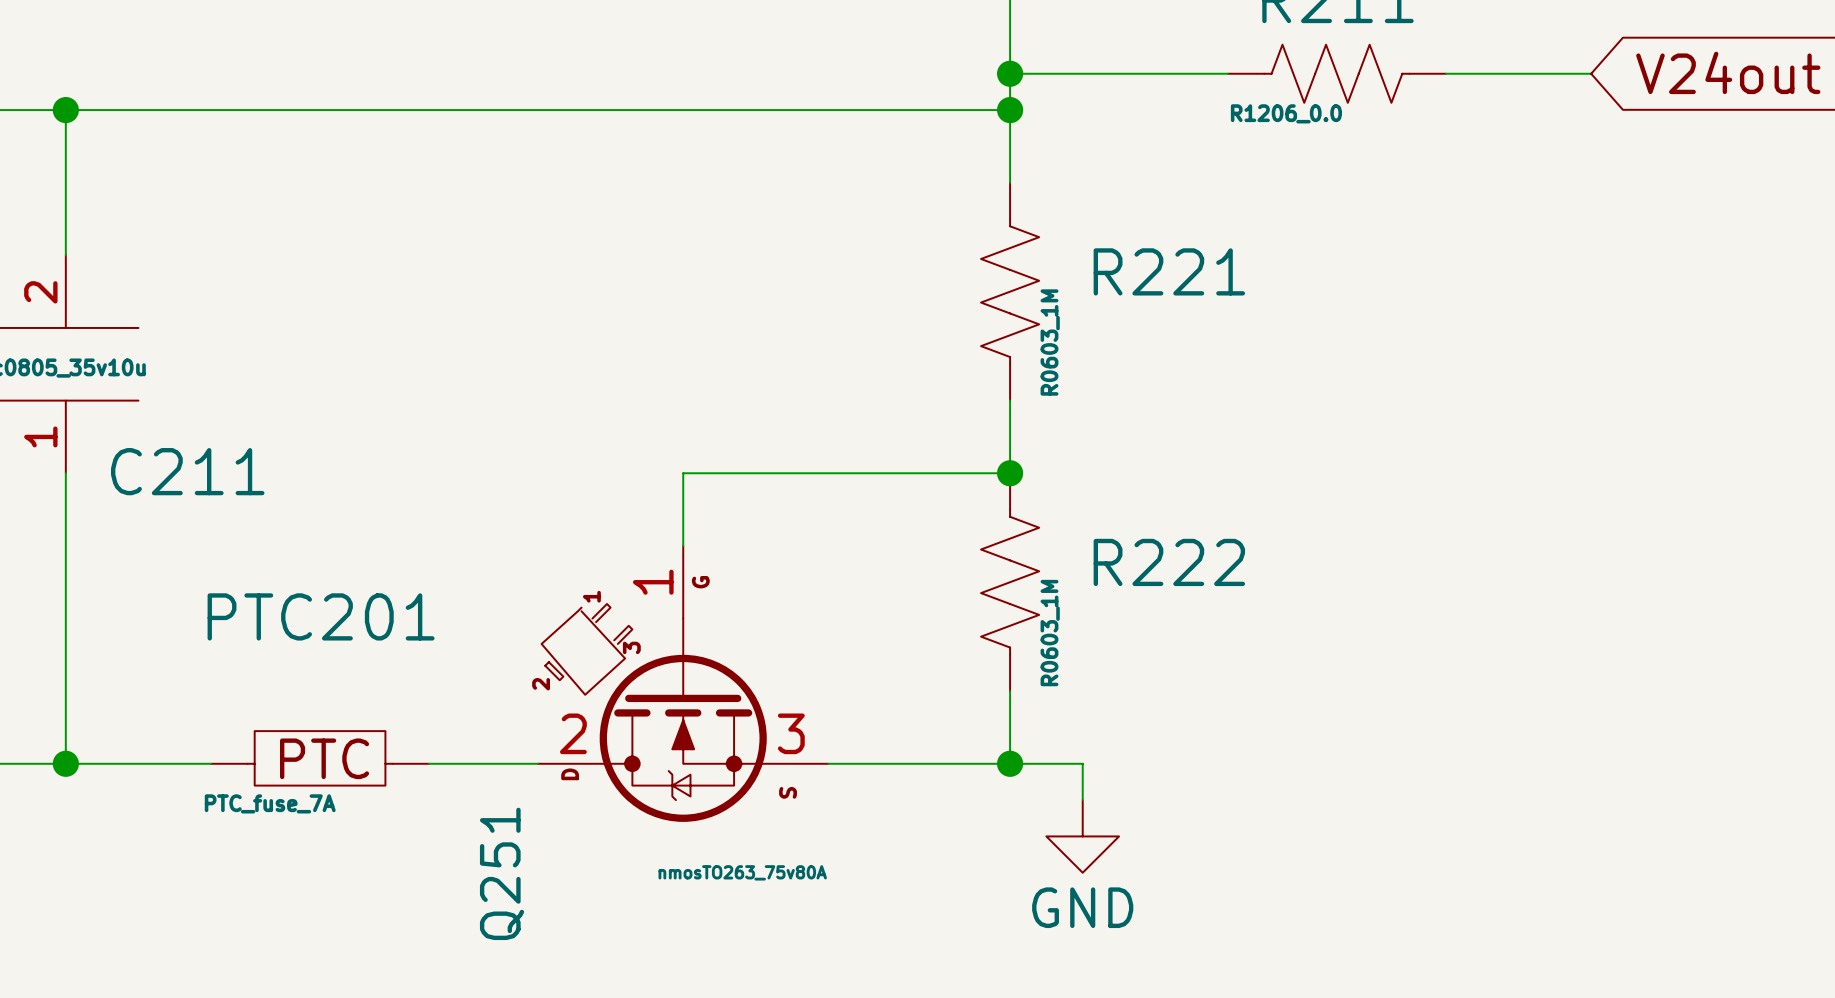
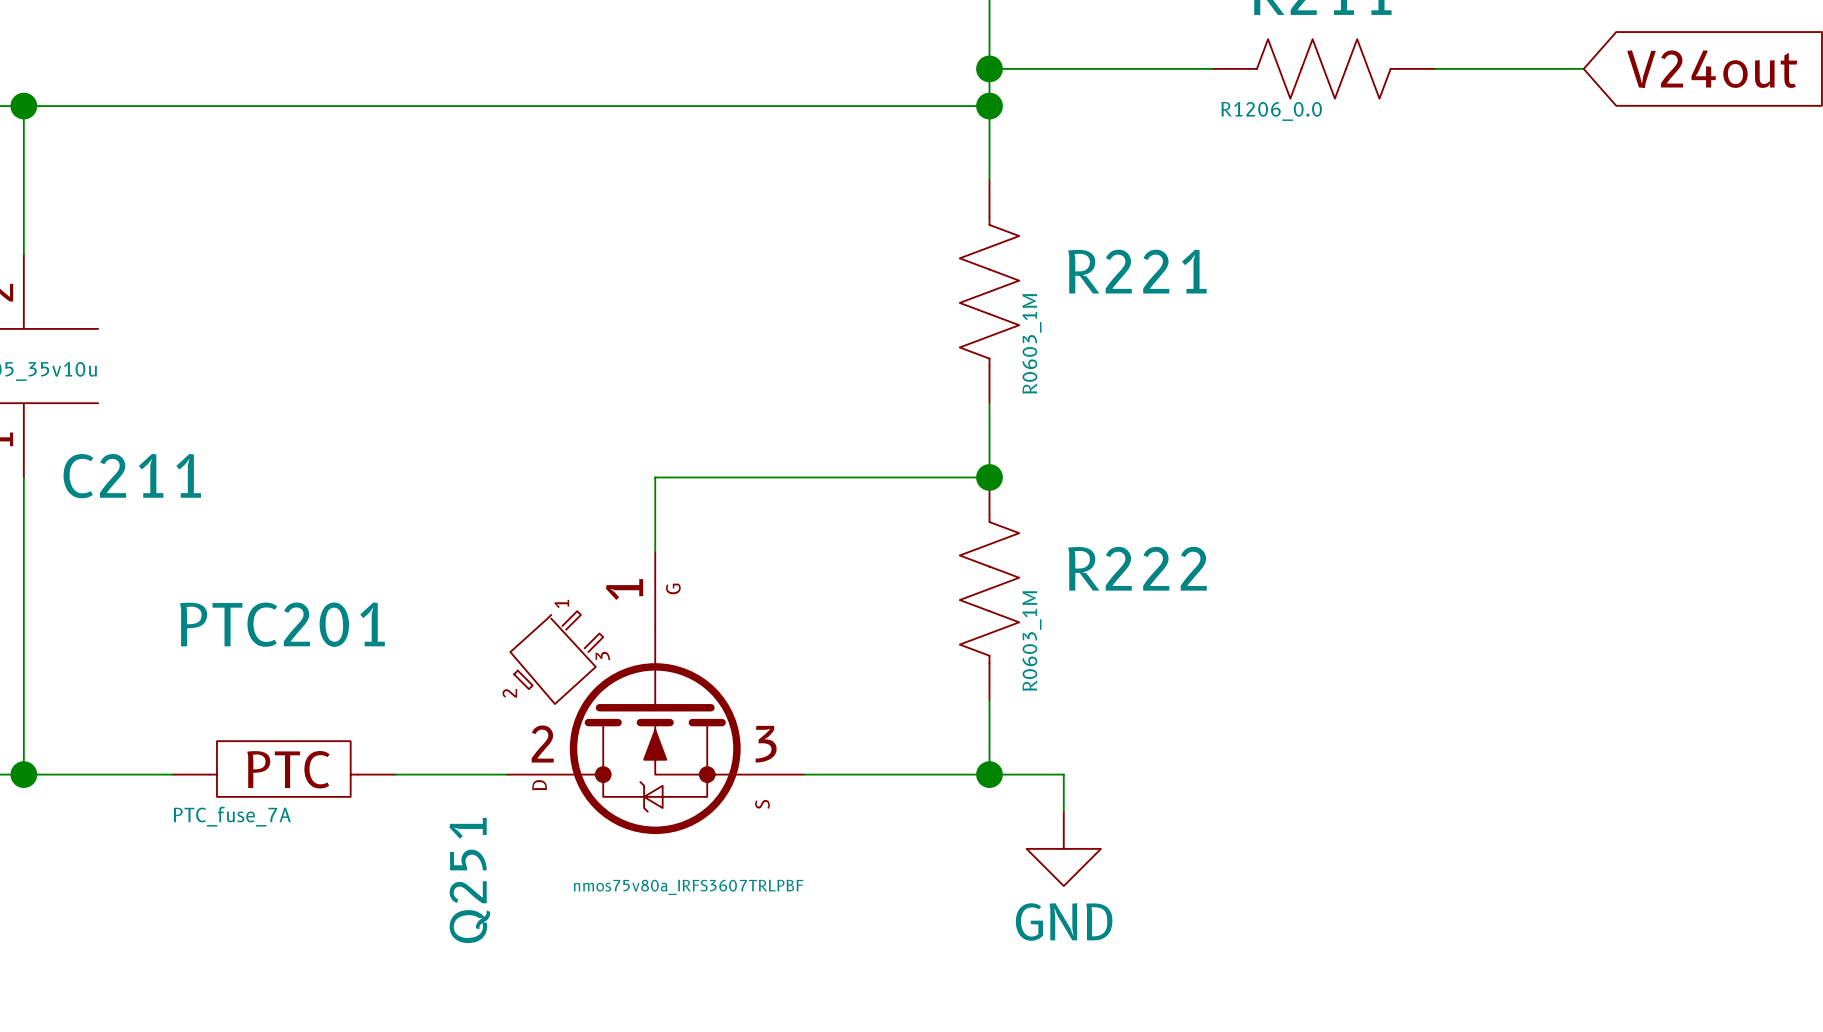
Q251 value: nmosTO263_75v80A (742, 872) -> nmos75v80a_IRFS3607TRLPBF (688, 887)

